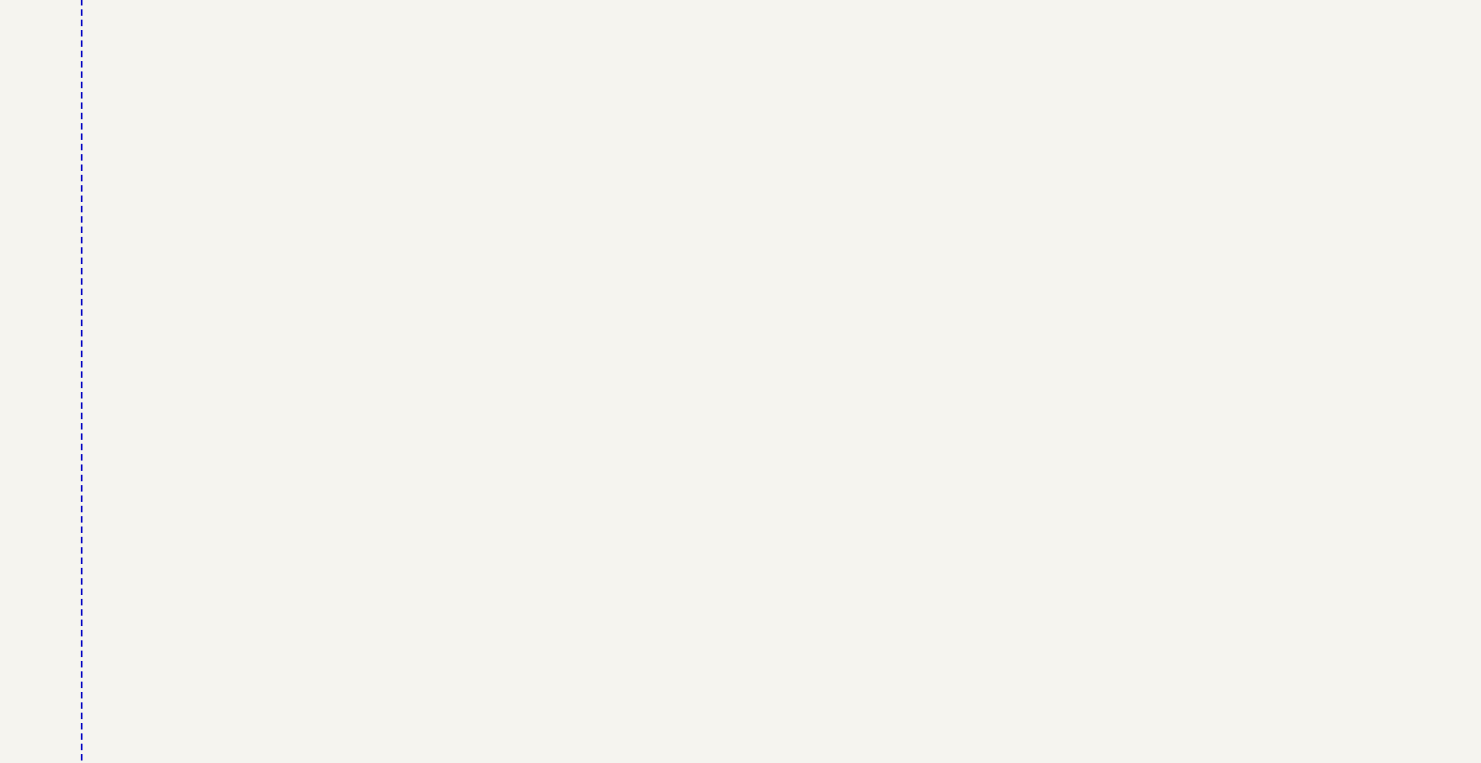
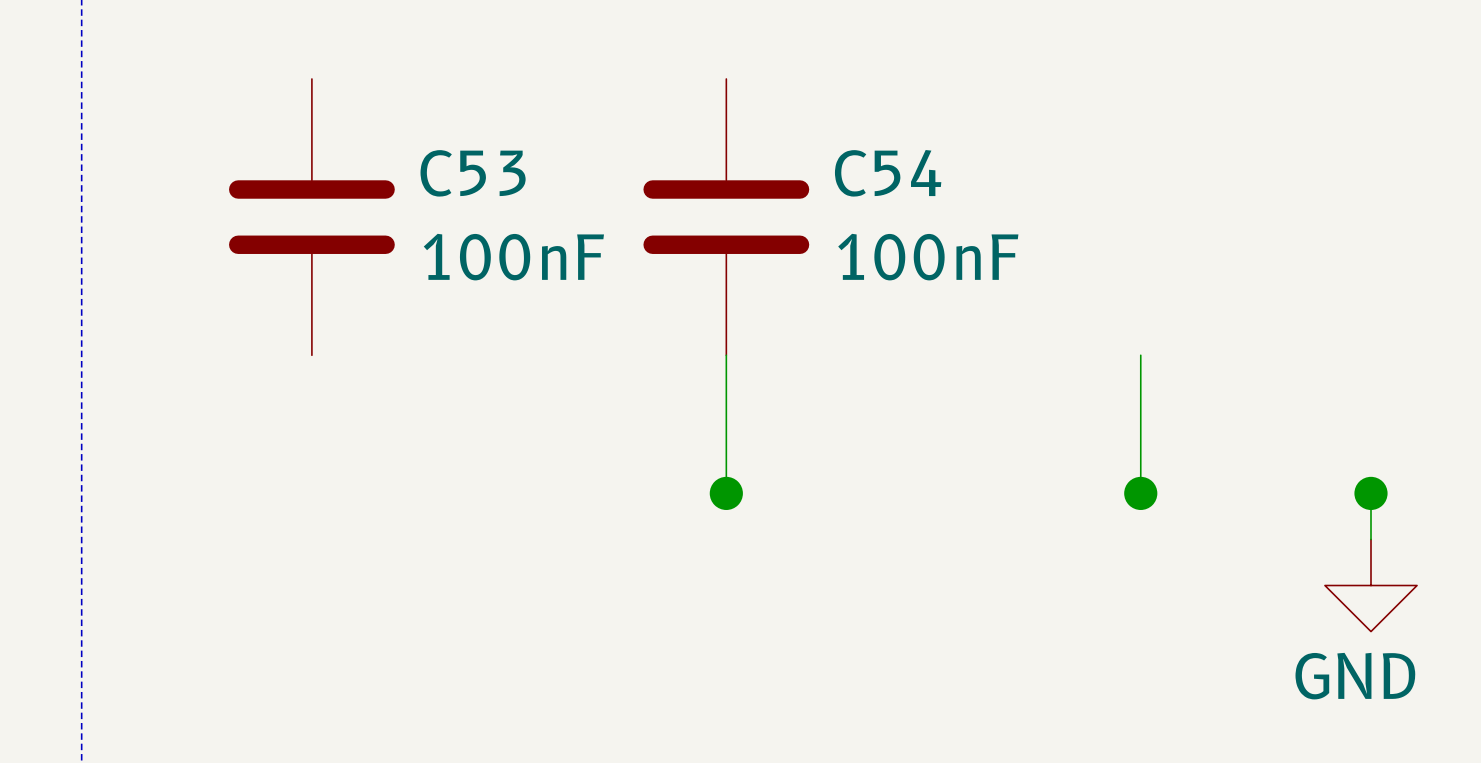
C53: none -> 100nF (311, 217)
C54: none -> 100nF (726, 217)
wire: none -> (726, 355) (726, 493)
wire: none -> (1140, 355) (1140, 493)
junction: none -> (726, 493)
junction: none -> (1140, 493)
wire: none -> (1370, 493) (1370, 539)
junction: none -> (1370, 493)
power symbol: none -> GND (1370, 585)

